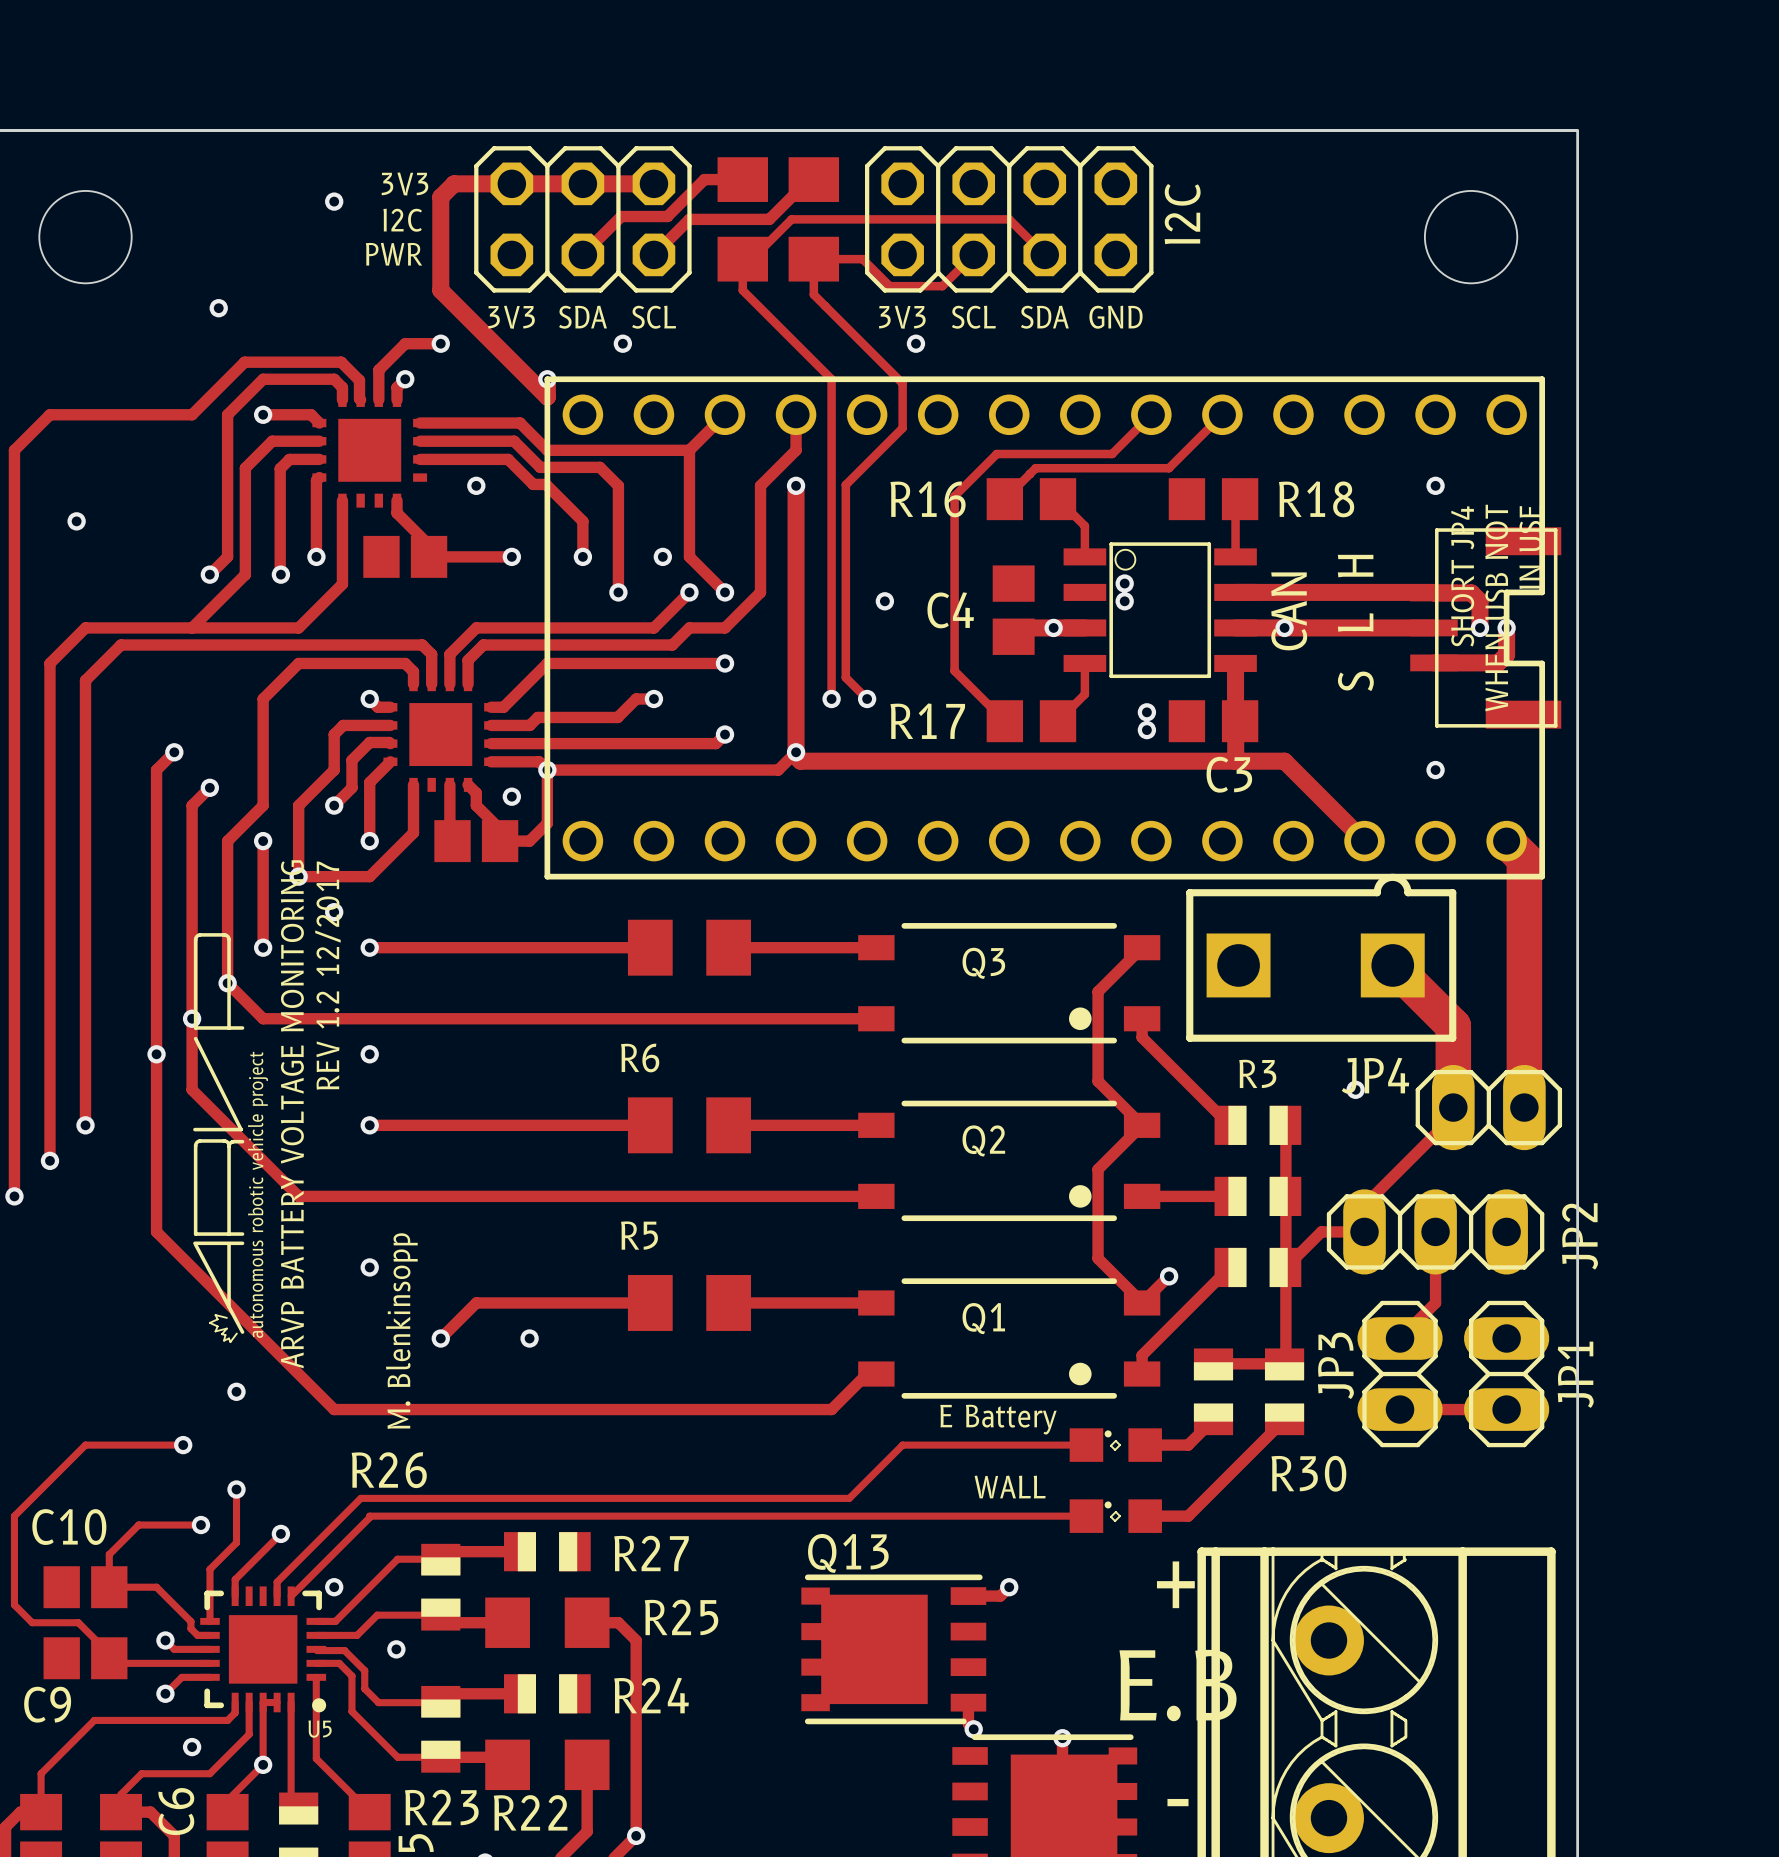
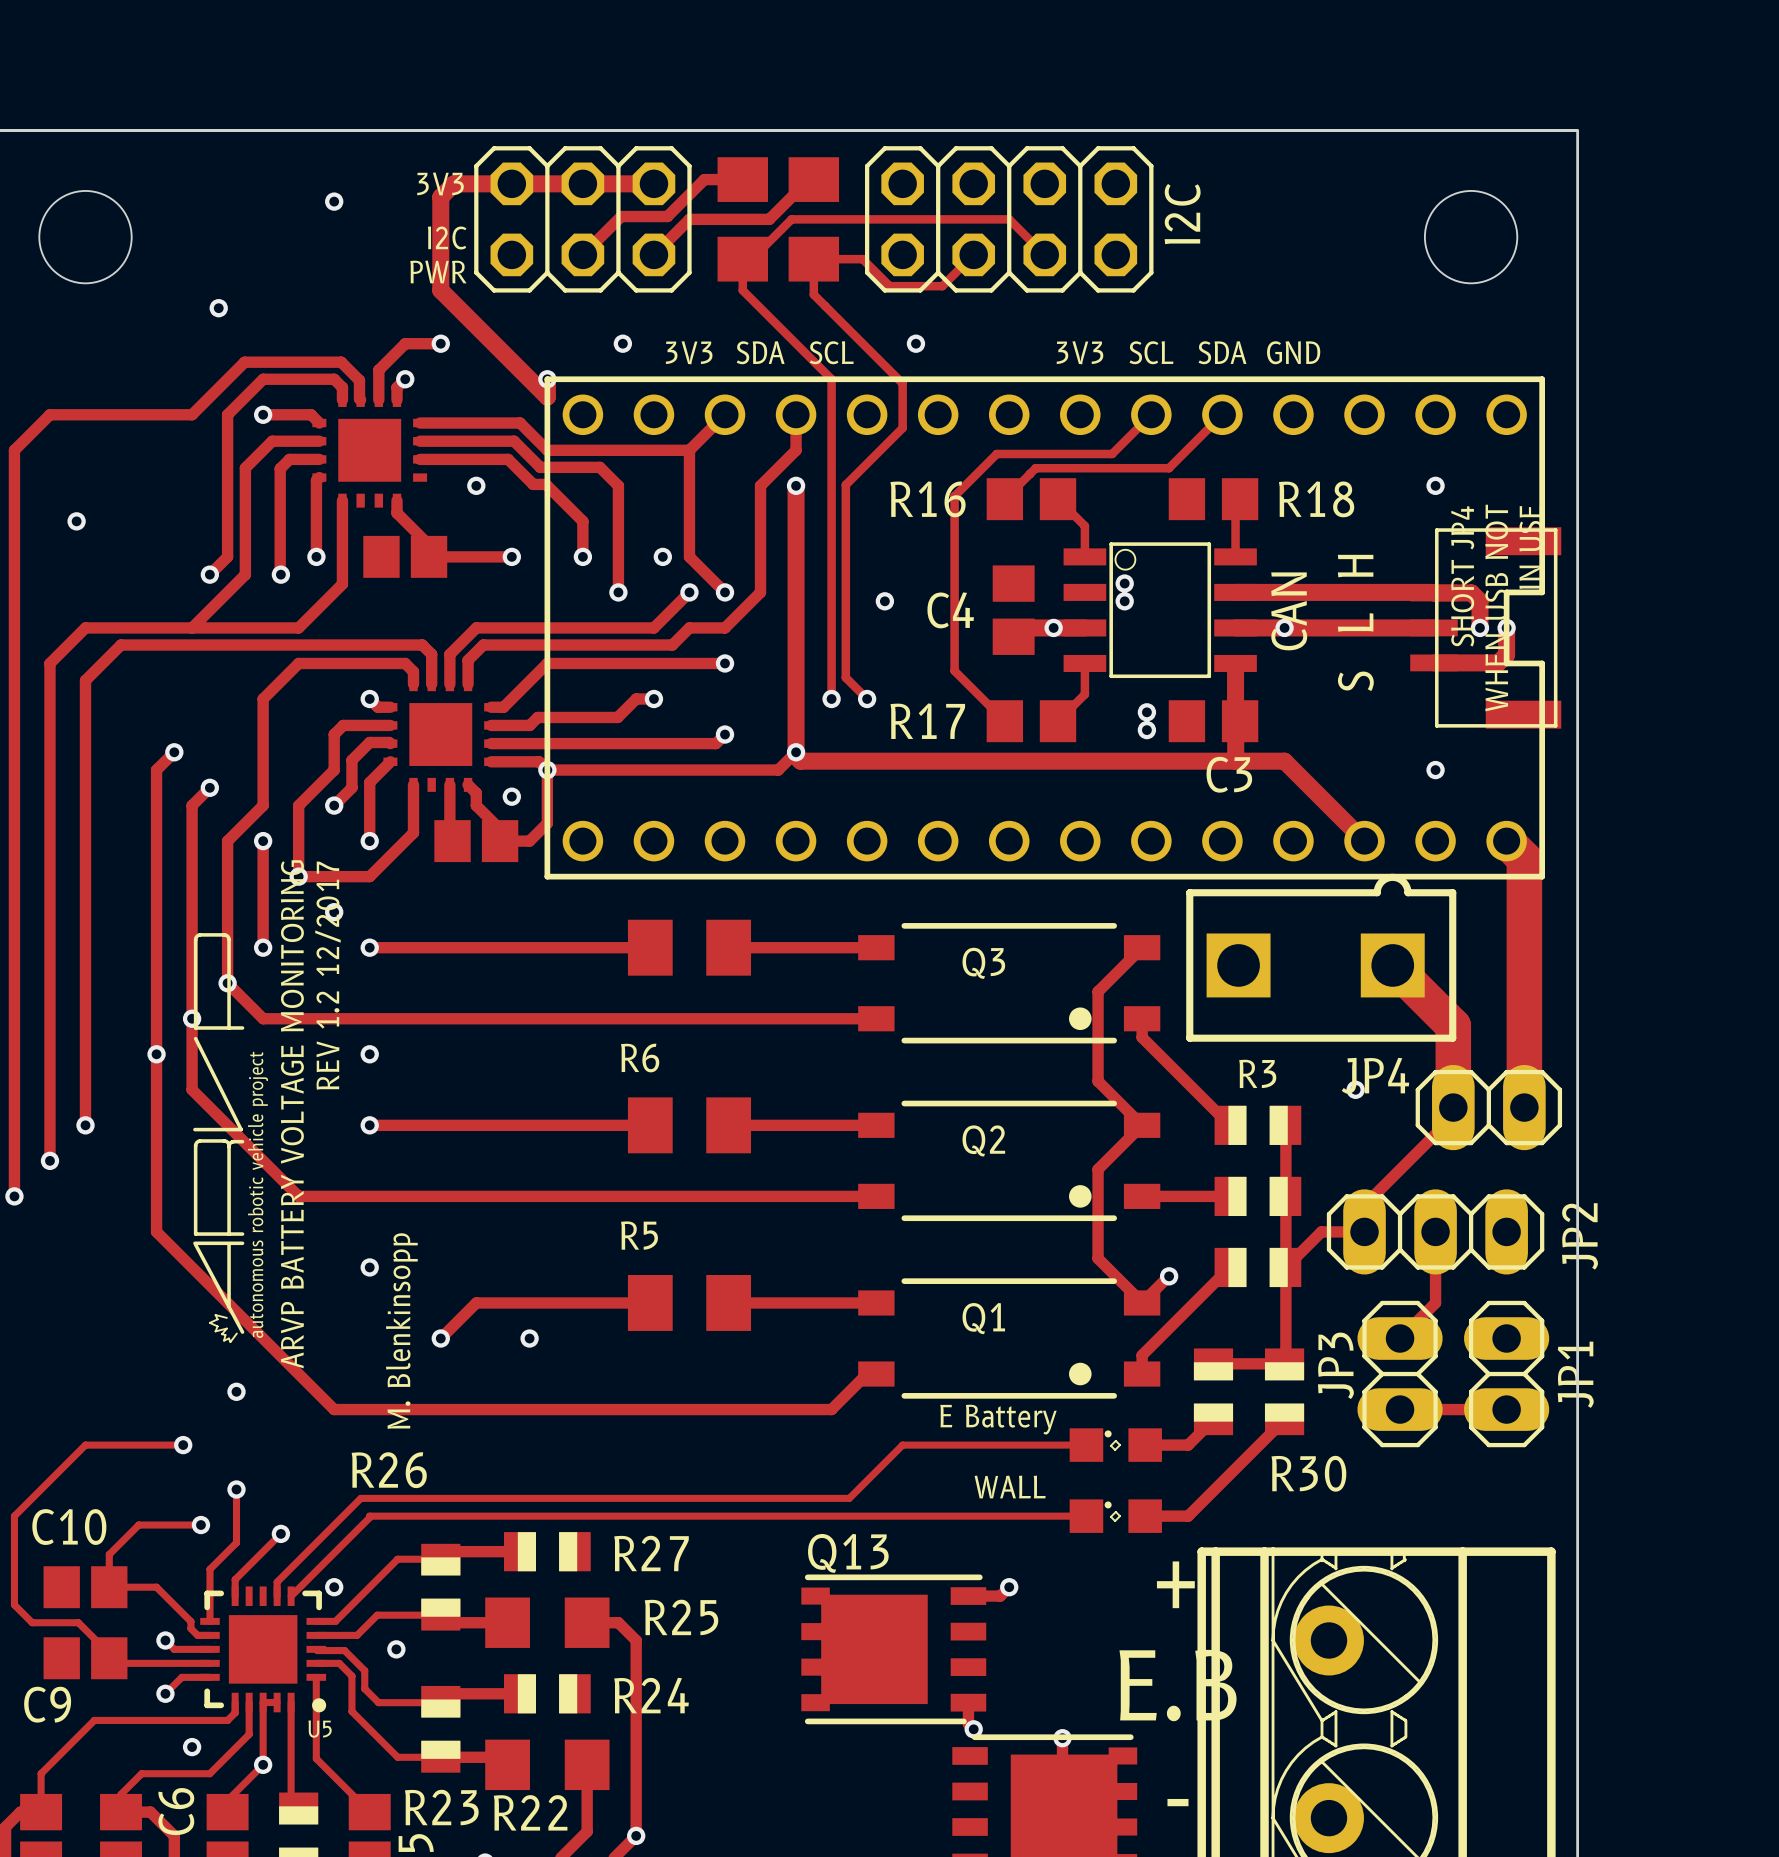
text position: 3V3 (404, 183) -> 3V3 (440, 183)
text position: I2C (402, 220) -> I2C (447, 237)
text position: PWR (393, 254) -> PWR (438, 271)
text: 3V3 (511, 317) -> none
text: SDA (583, 317) -> none
text: SCL (654, 317) -> none
text: 3V3 (902, 317) -> none
text: SCL (973, 317) -> none
text: SDA (1044, 317) -> none
text position: GND (1116, 317) -> GND (1293, 352)
text: none -> 3V3 (689, 352)
text: none -> SDA (760, 352)
text: none -> SCL (831, 352)
text: none -> 3V3 (1080, 352)
text: none -> SCL (1151, 352)
text: none -> SDA (1222, 352)

